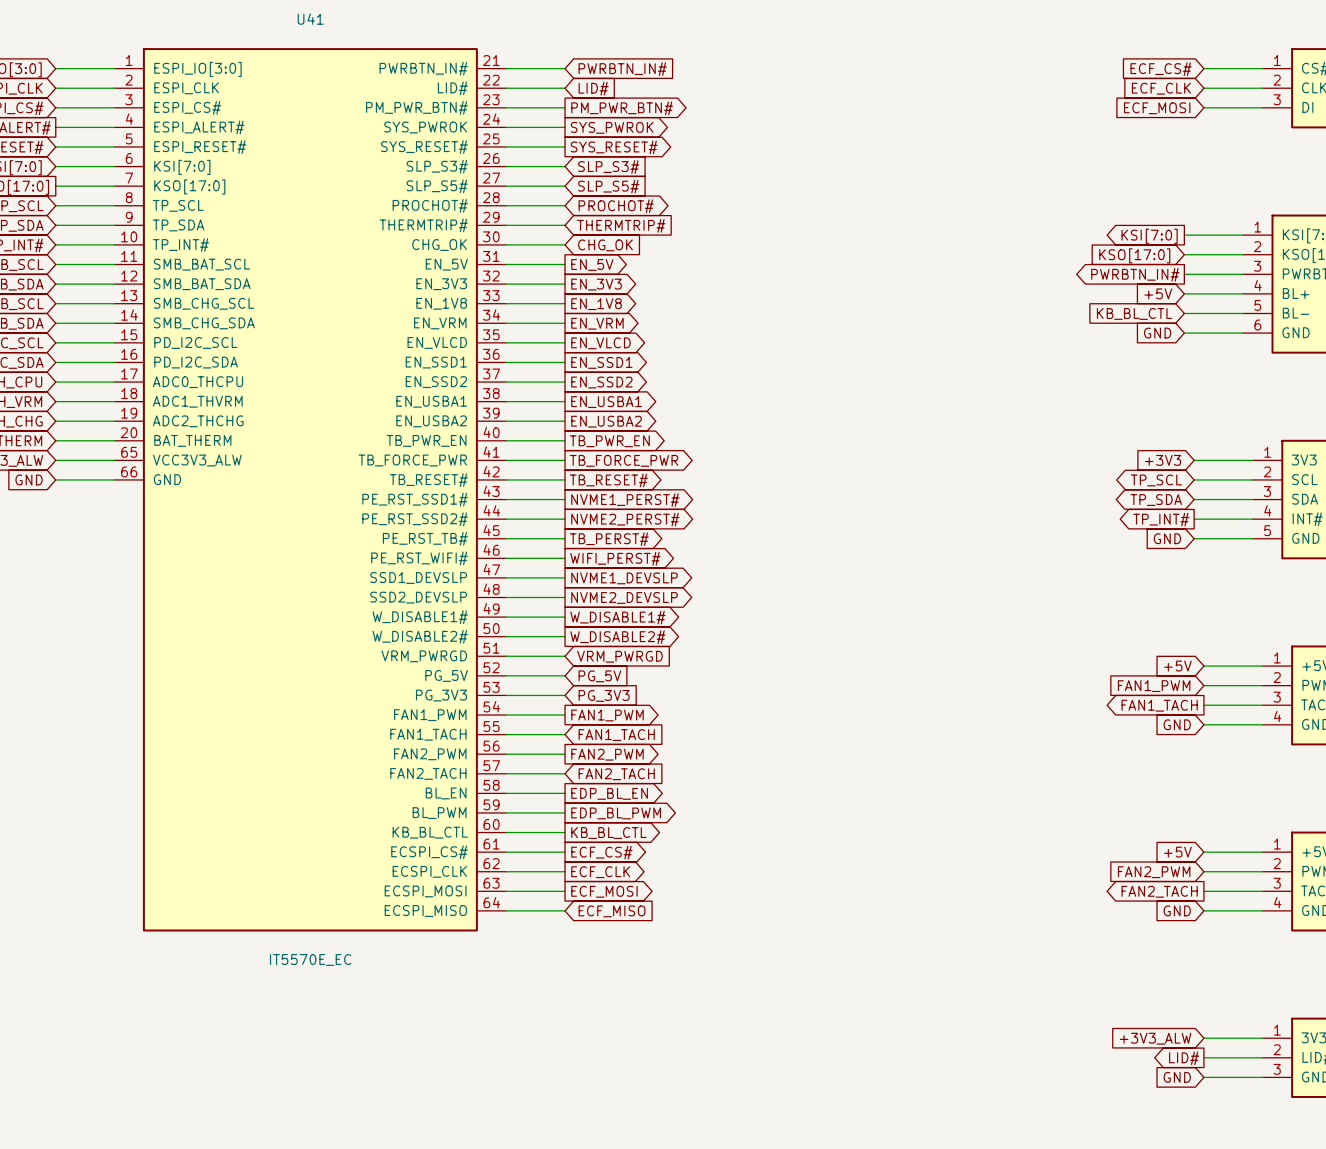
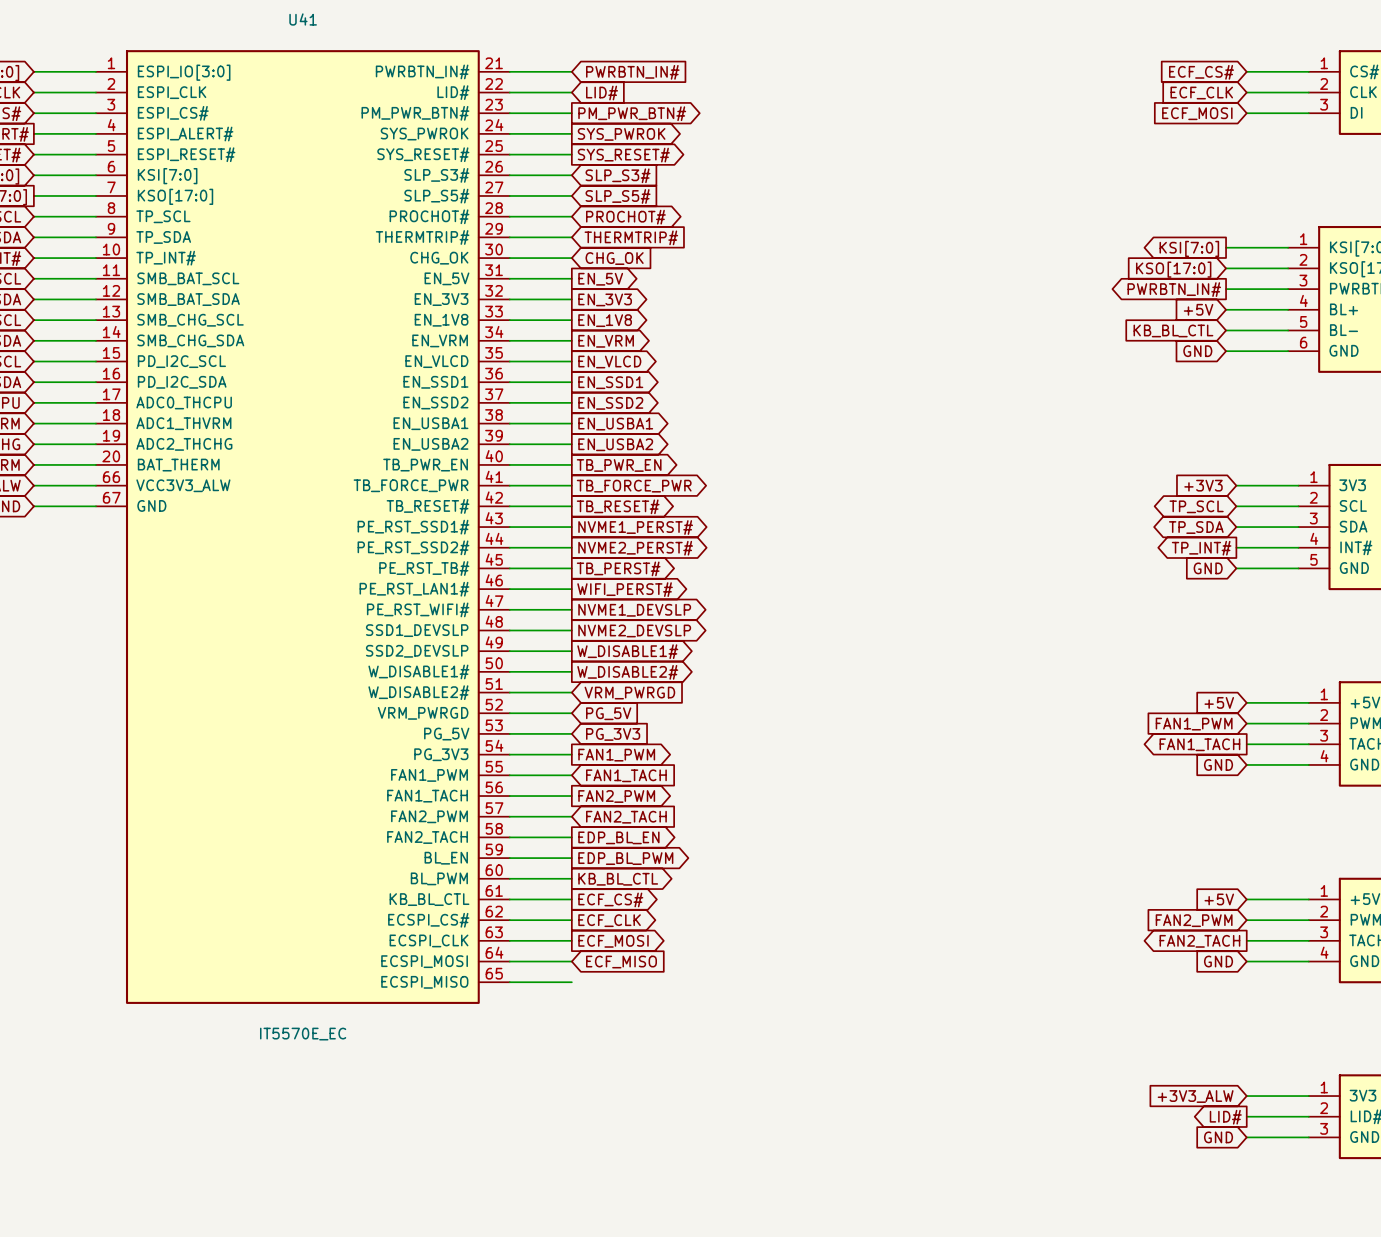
U41 symbol: [114, 48, 507, 932] -> [95, 50, 510, 1004]
wire: none -> (509, 982) (571, 982)

